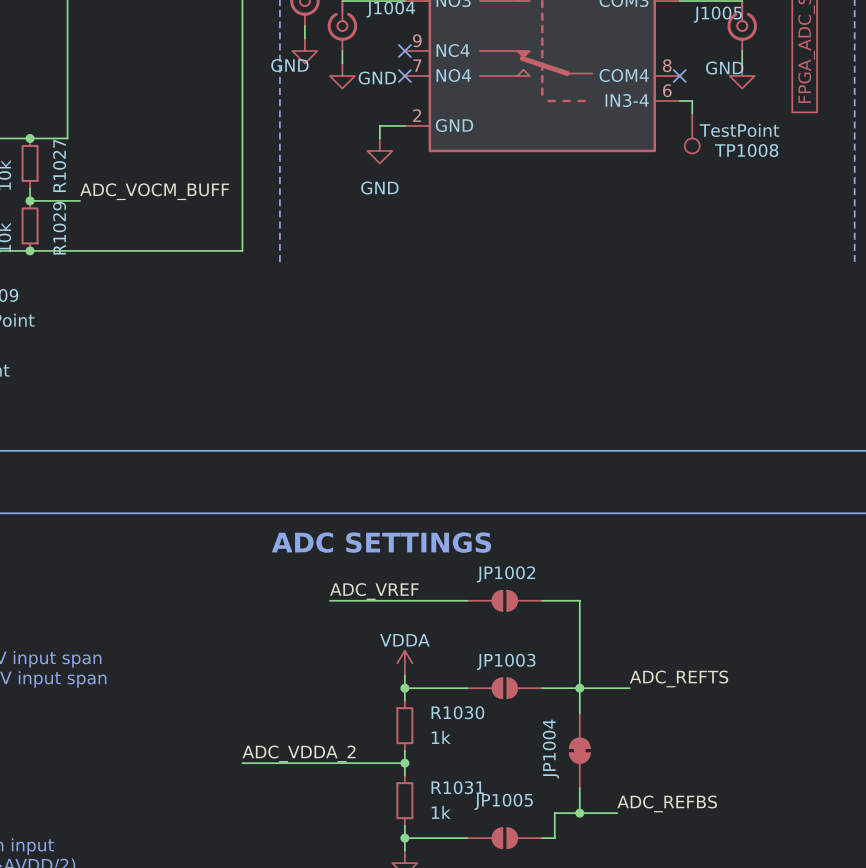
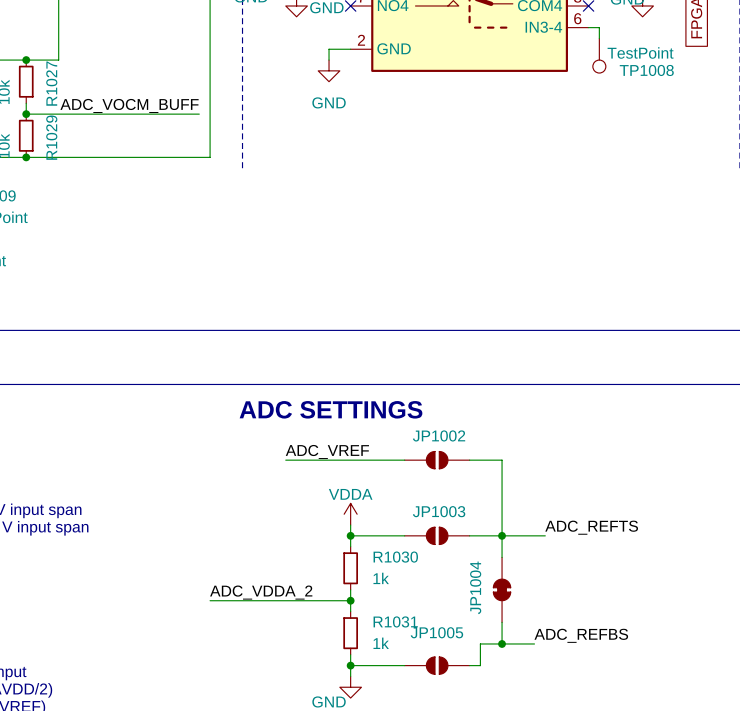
label position: ADC_VOCM_BUFF (154, 191) -> ADC_VOCM_BUFF (129, 105)
wire: none -> (69, 114) (199, 114)

